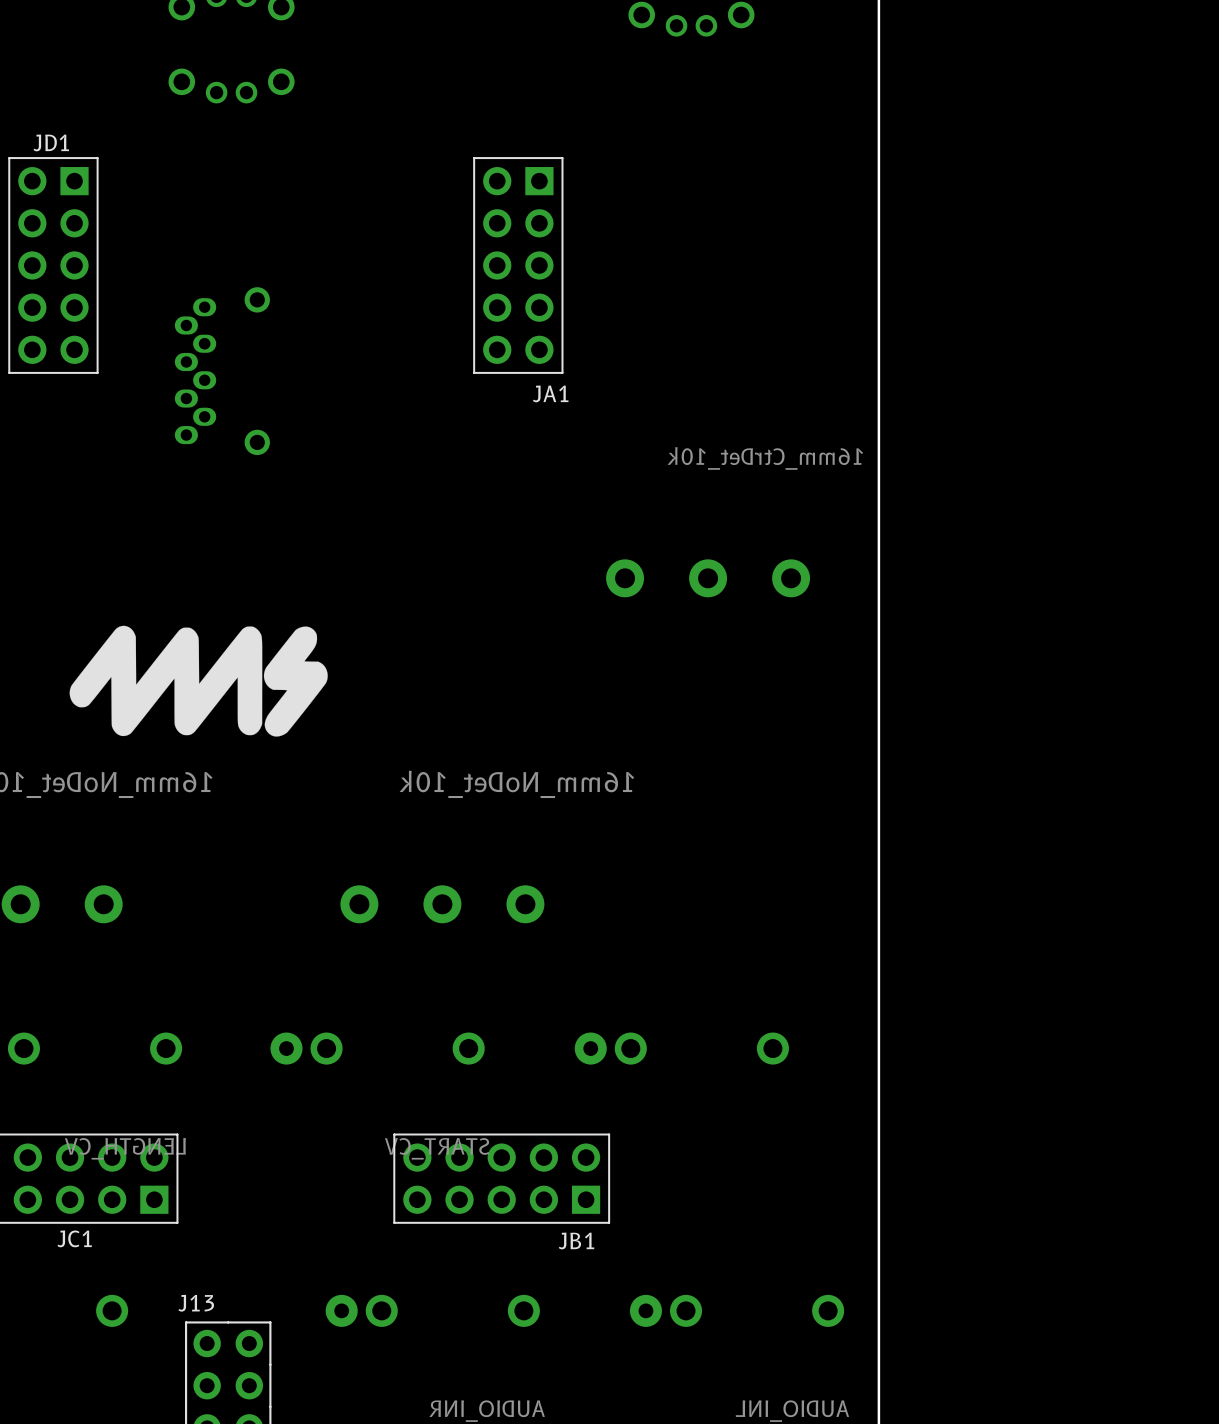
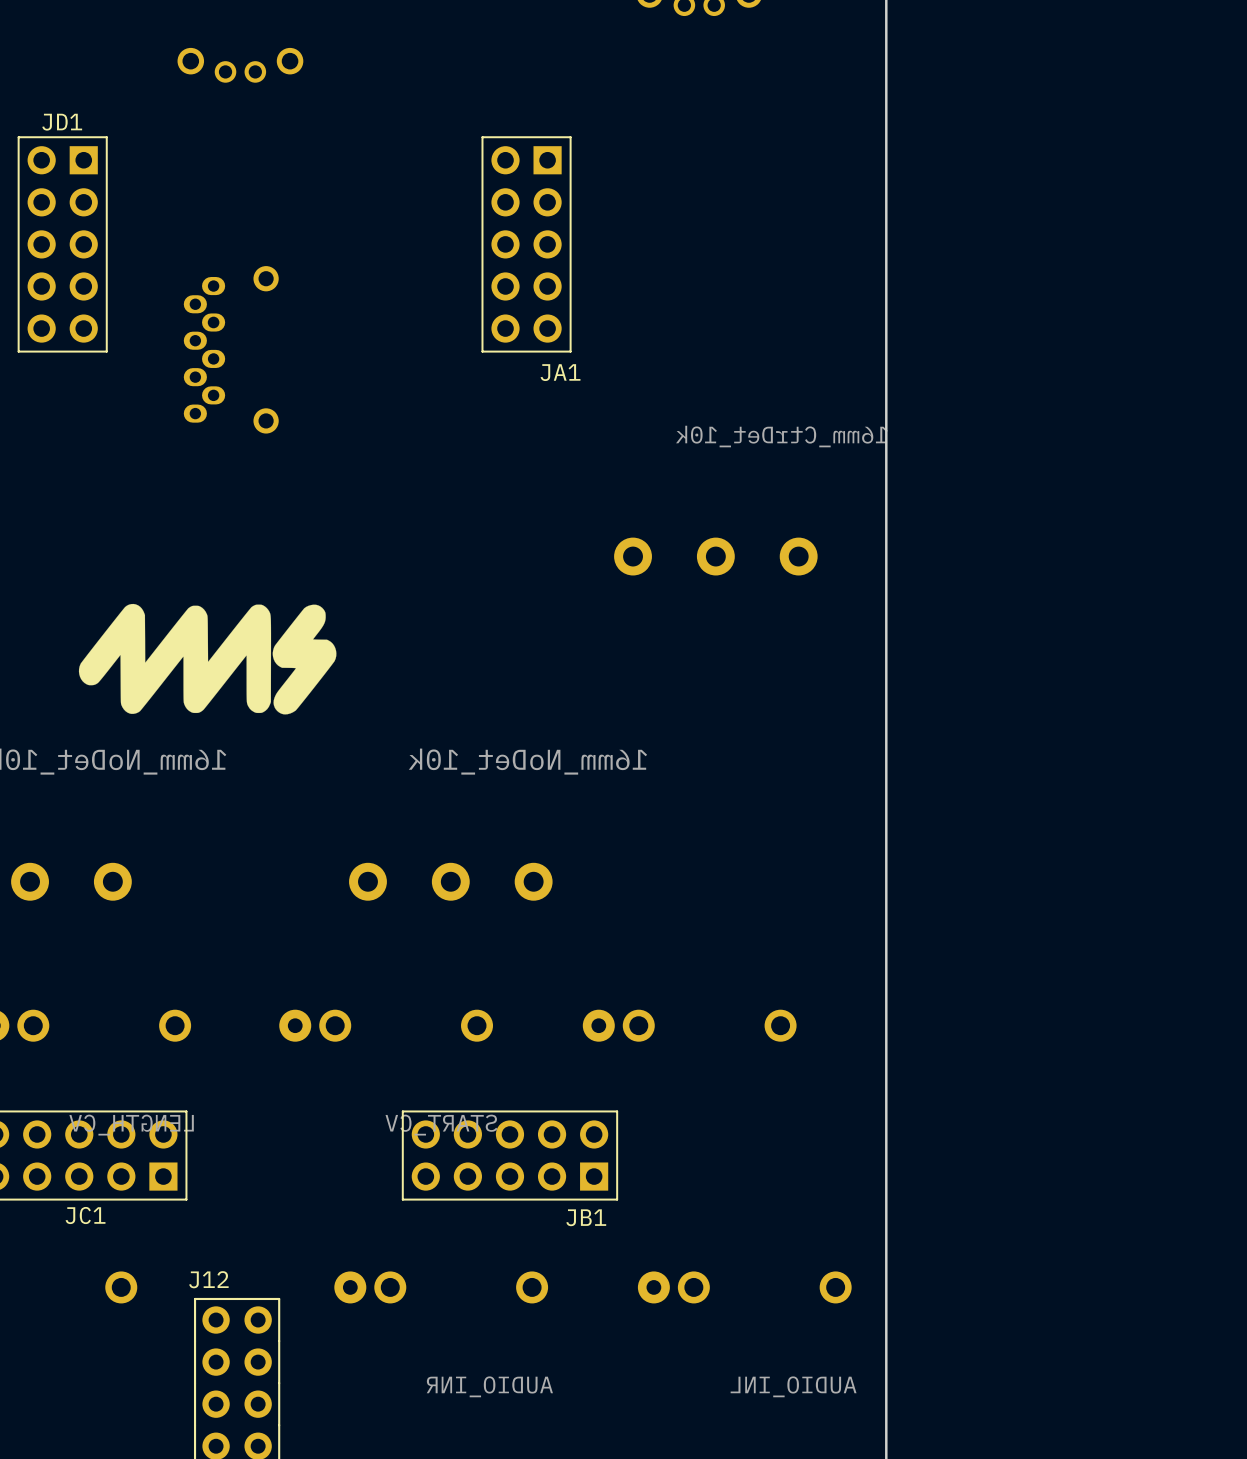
J13 name: J13 (196, 1303) -> J12 (208, 1279)

